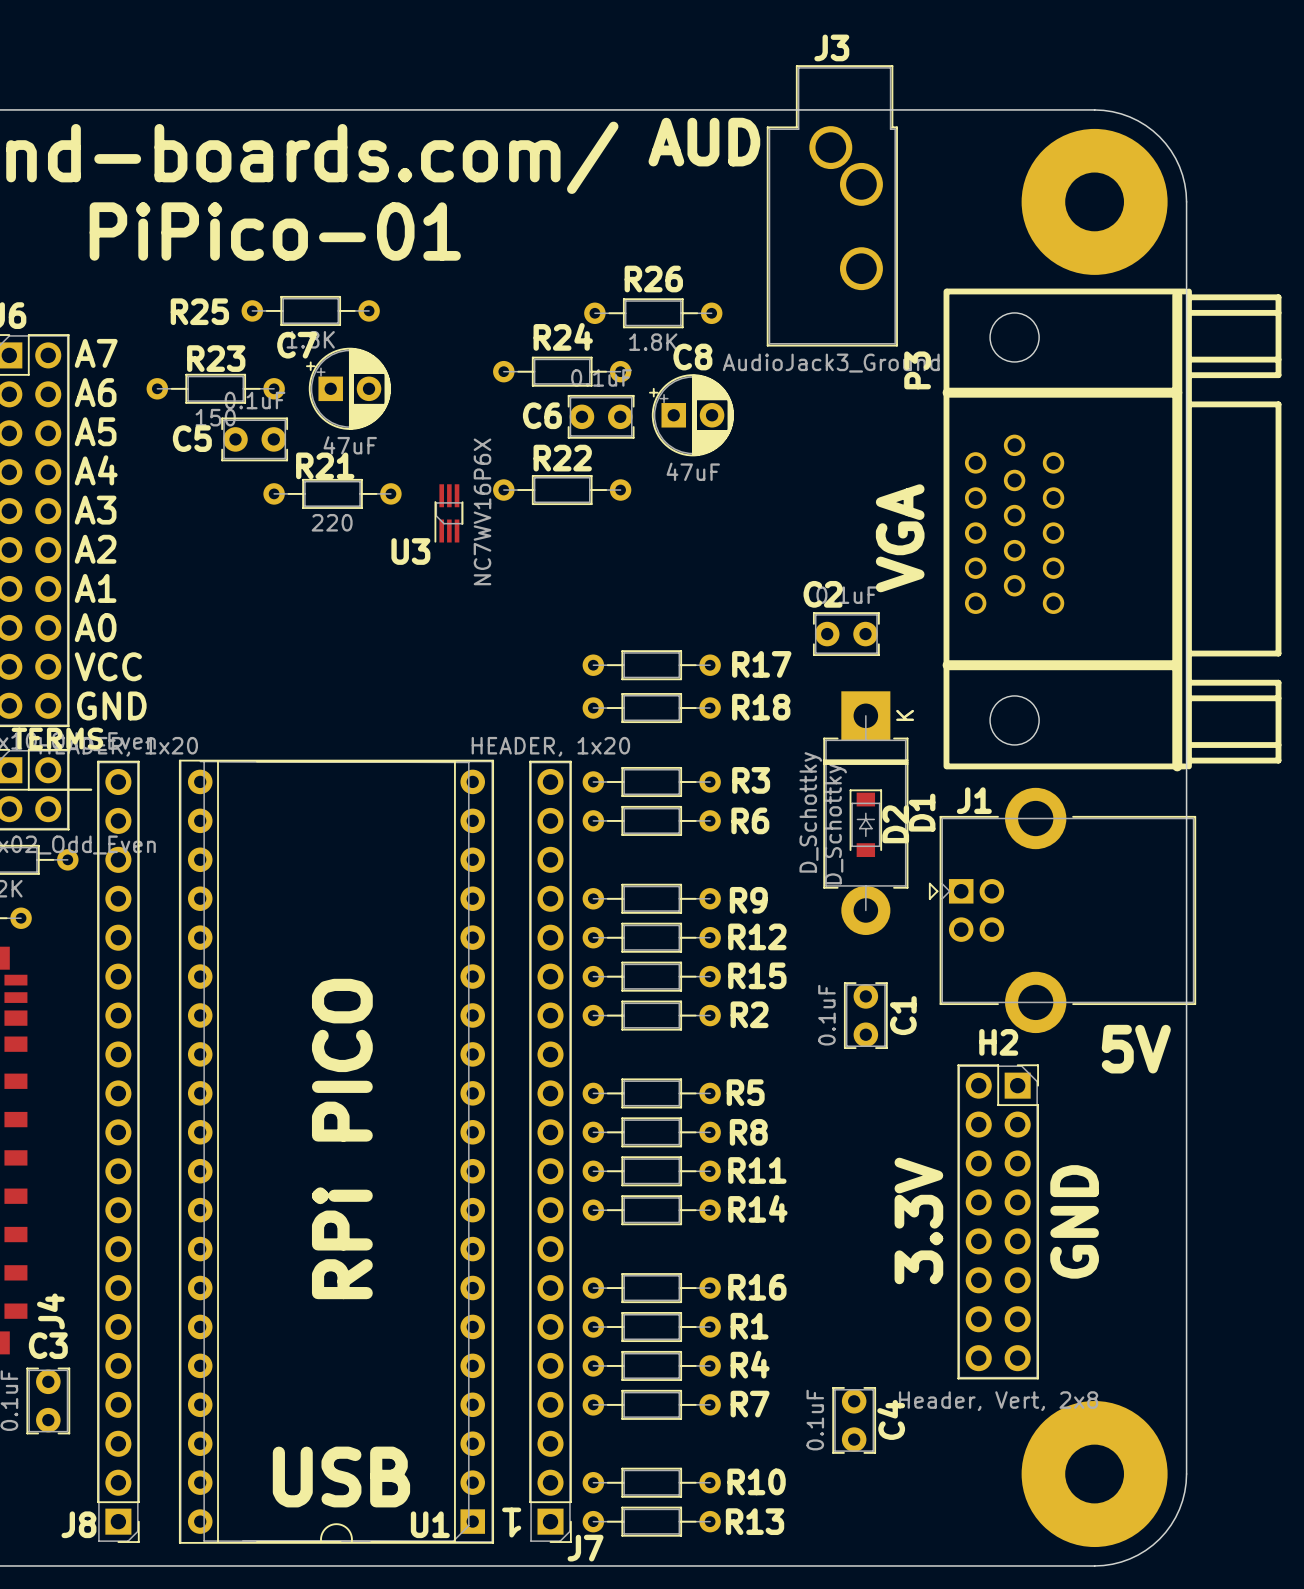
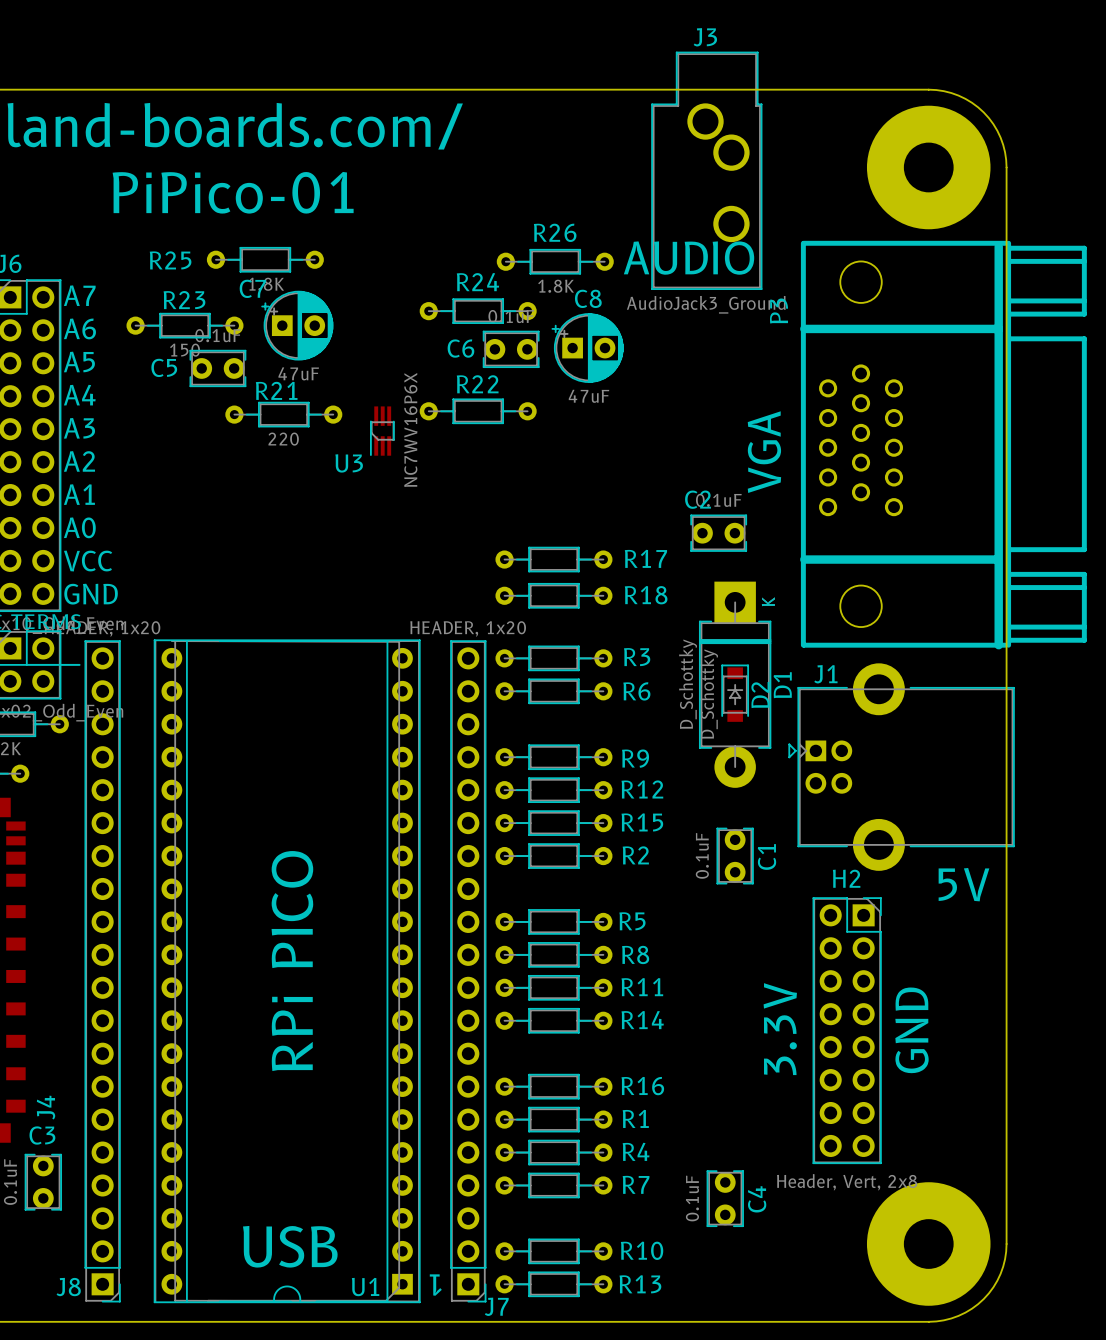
text: AUD (704, 142) -> none
text: none -> AUDIO (689, 258)

